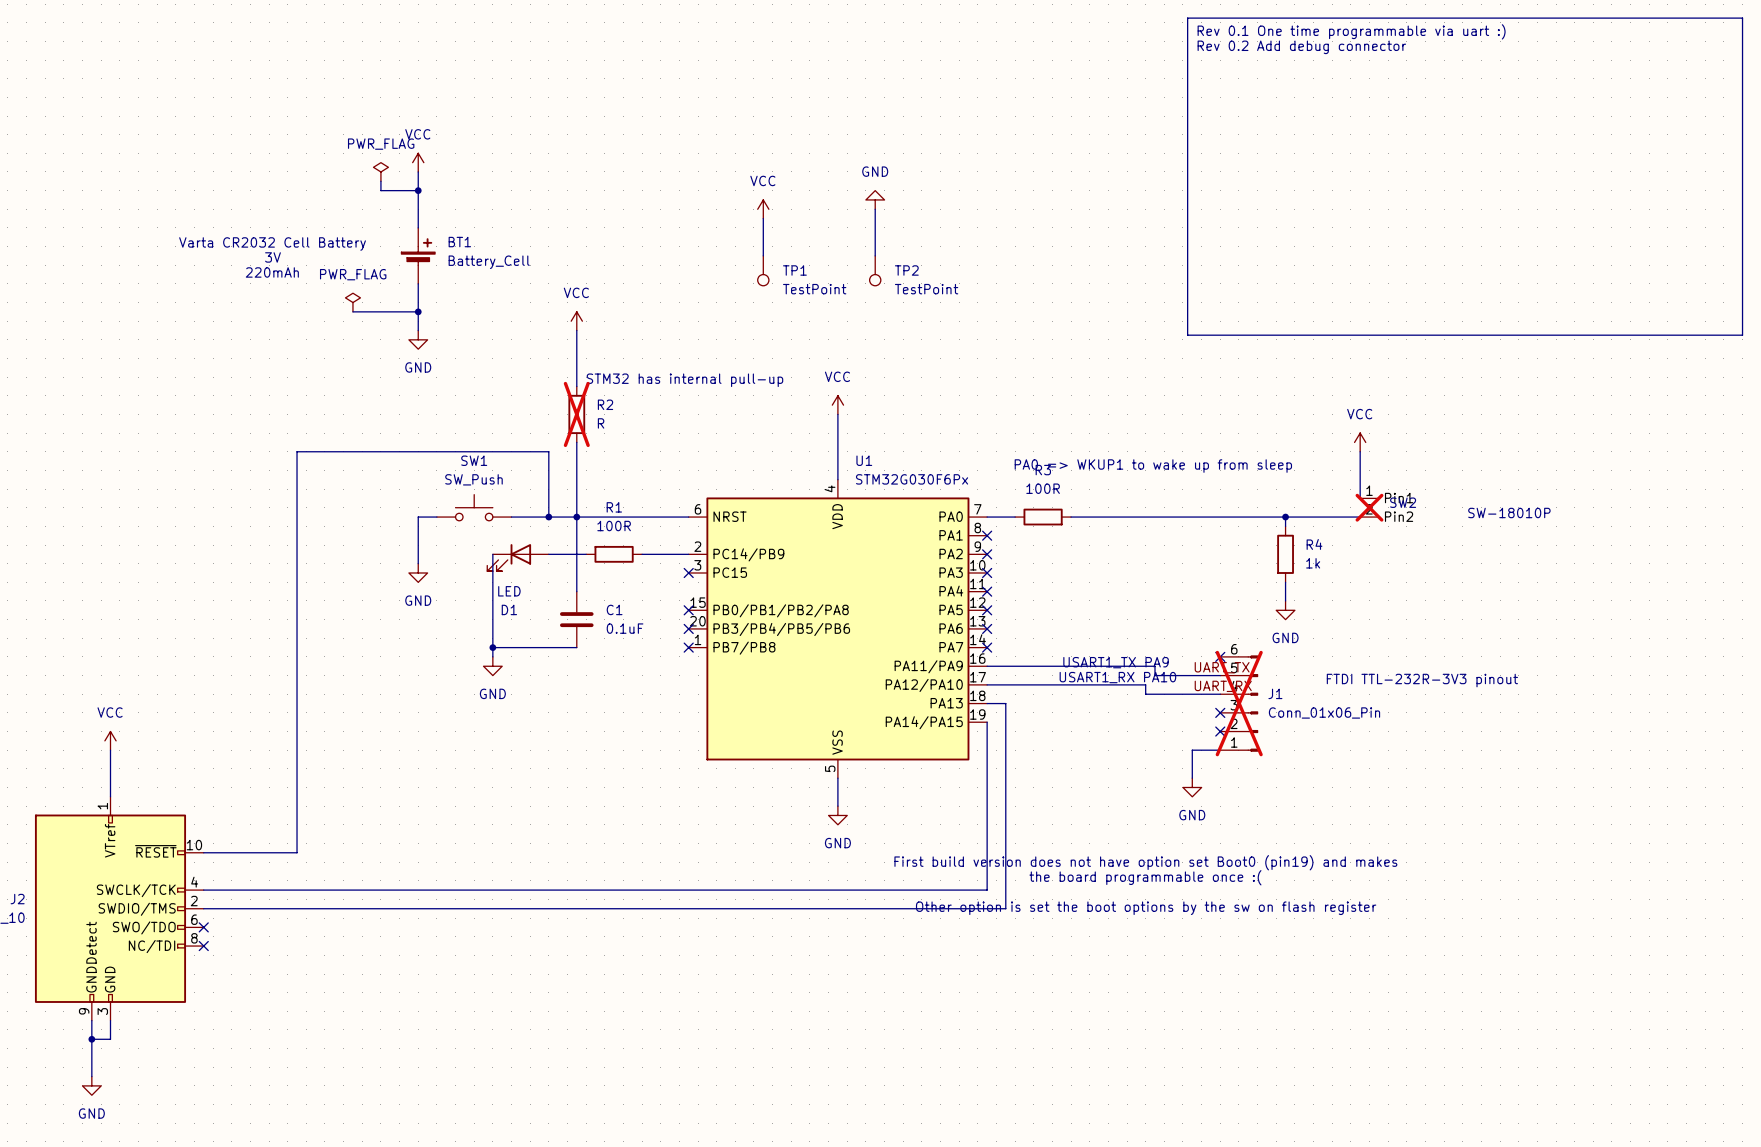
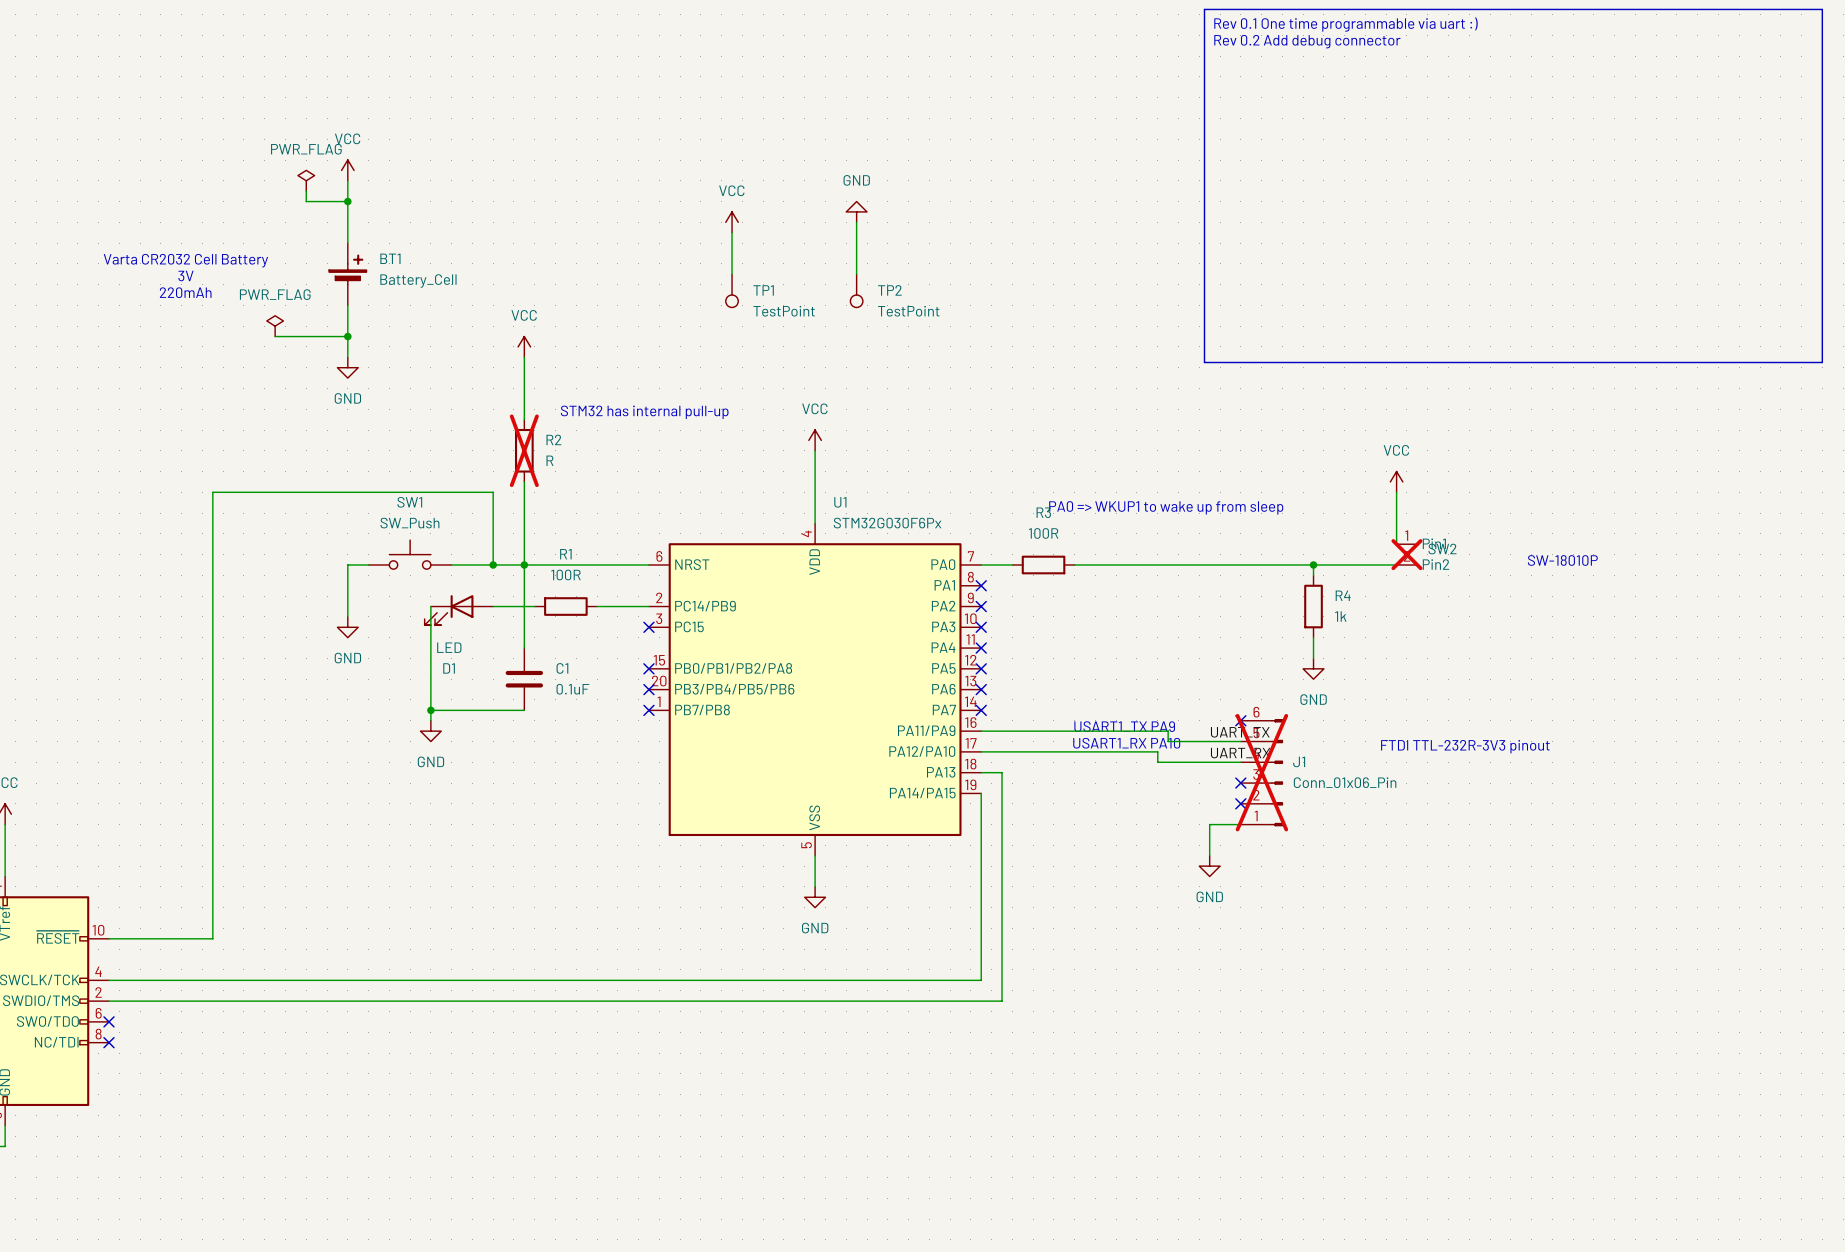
text: First build version does not have option set Boot0 (pin19) and makes (1145, 862) -> none
text: the board programmable once :( (1145, 877) -> none
text: Other option is set the boot options by the sw on flash register (1146, 908) -> none

